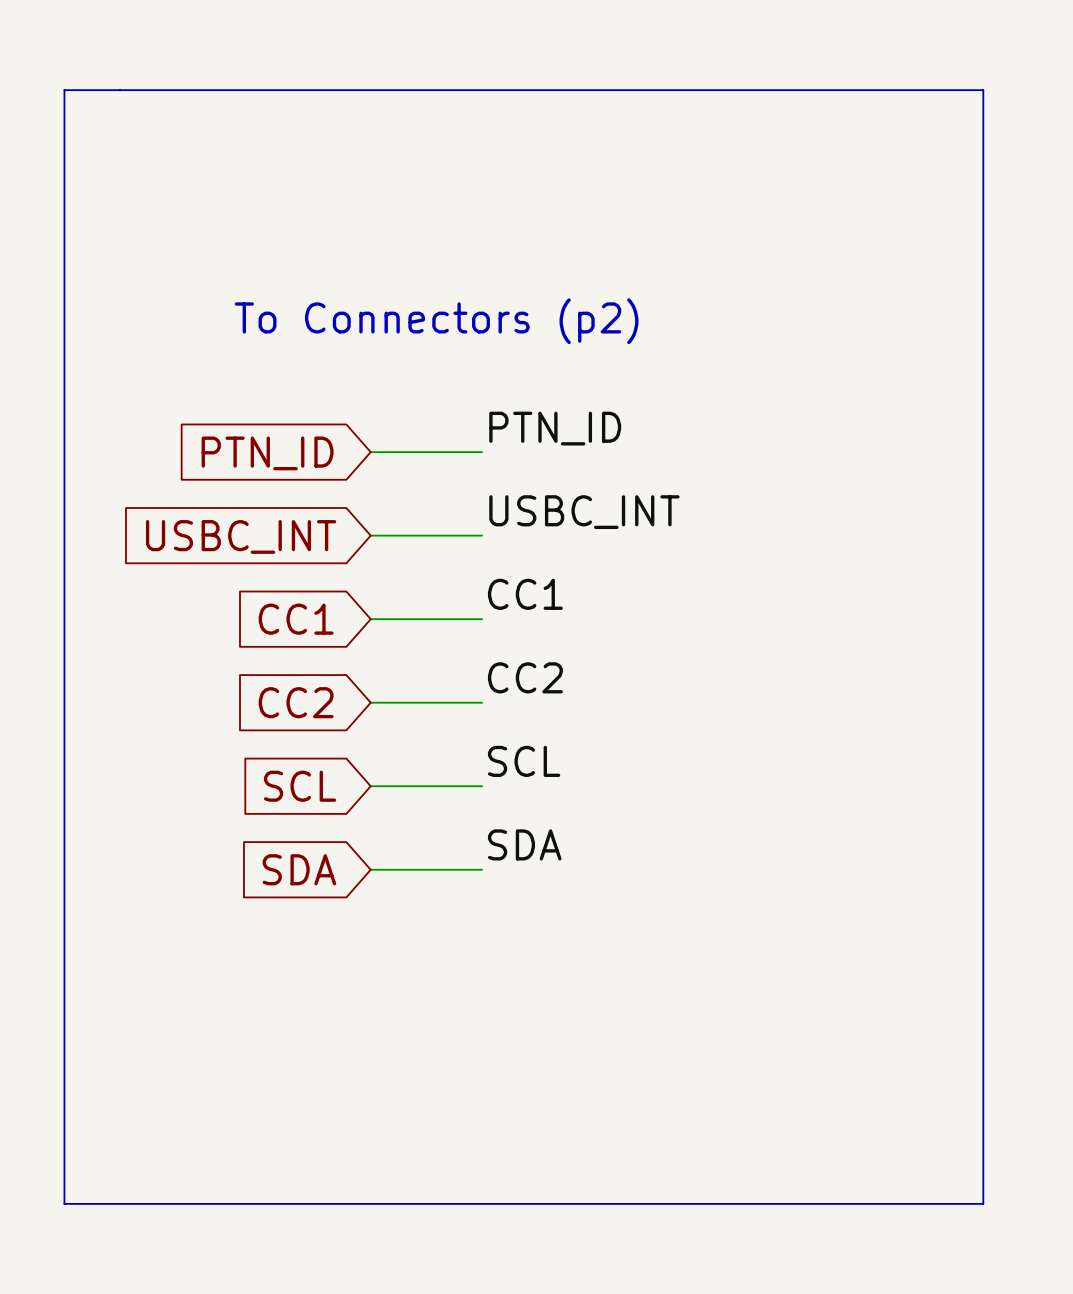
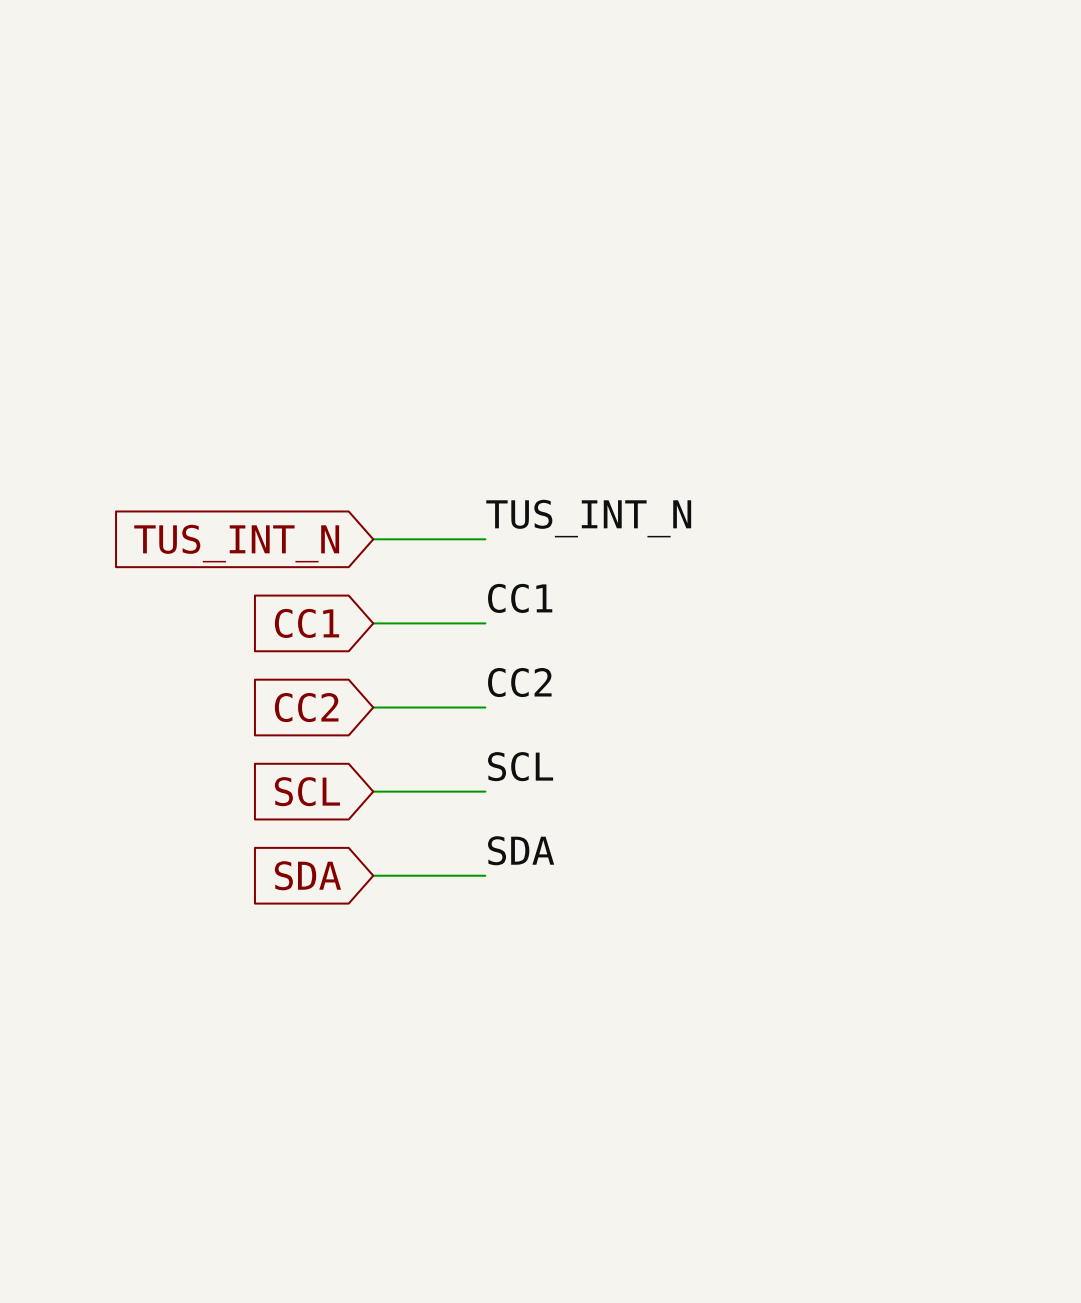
line: (64, 90) (983, 90) (983, 1203) (64, 1203) (64, 90) -> none
text: To Connectors (p2) (436, 321) -> none
label: PTN_ID (555, 428) -> none
wire: (370, 452) (482, 452) -> none
global label: PTN_ID (267, 453) -> none
label: USBC_INT (584, 512) -> TUS_INT_N (588, 518)
global label: USBC_INT (241, 536) -> TUS_INT_N (236, 543)

